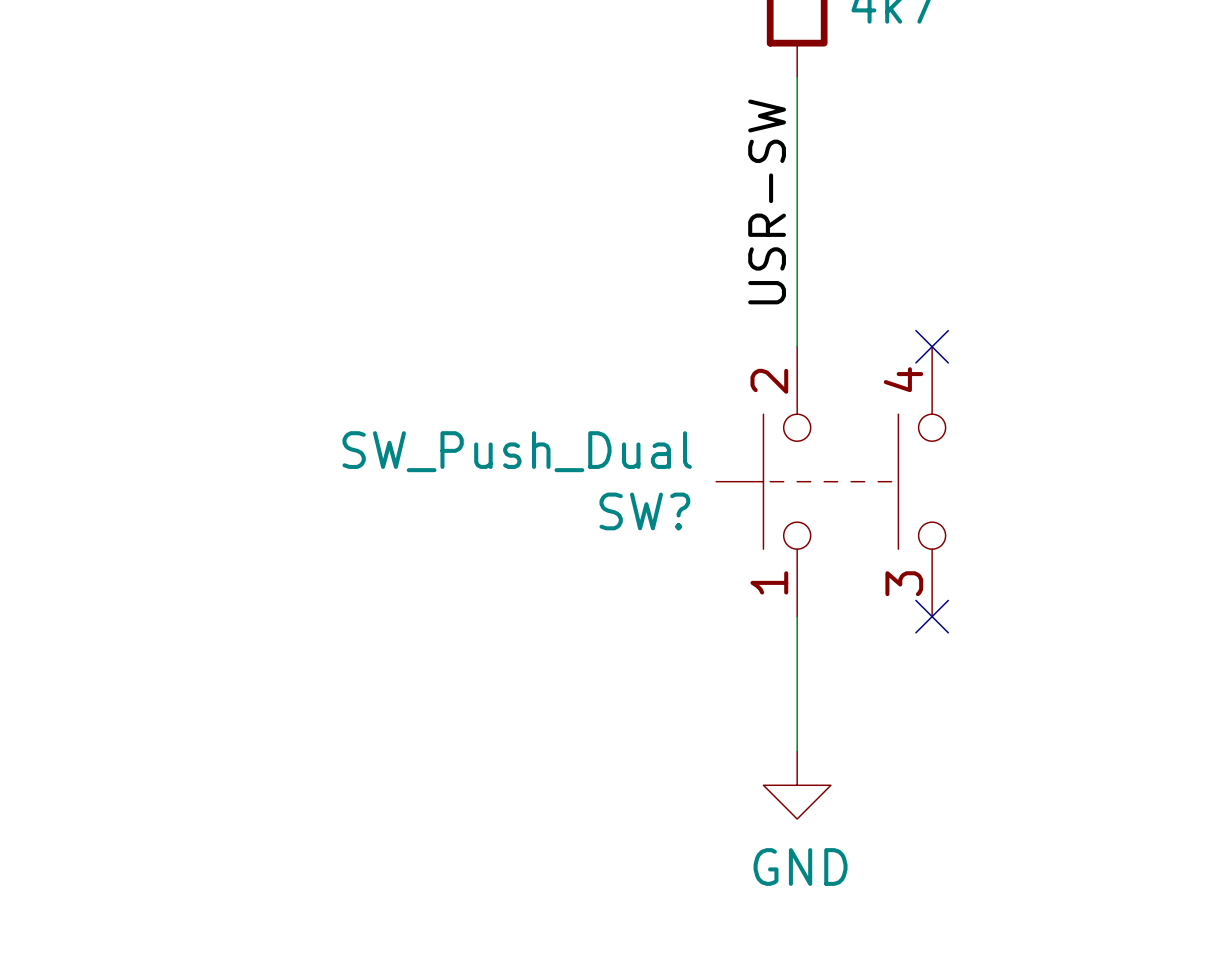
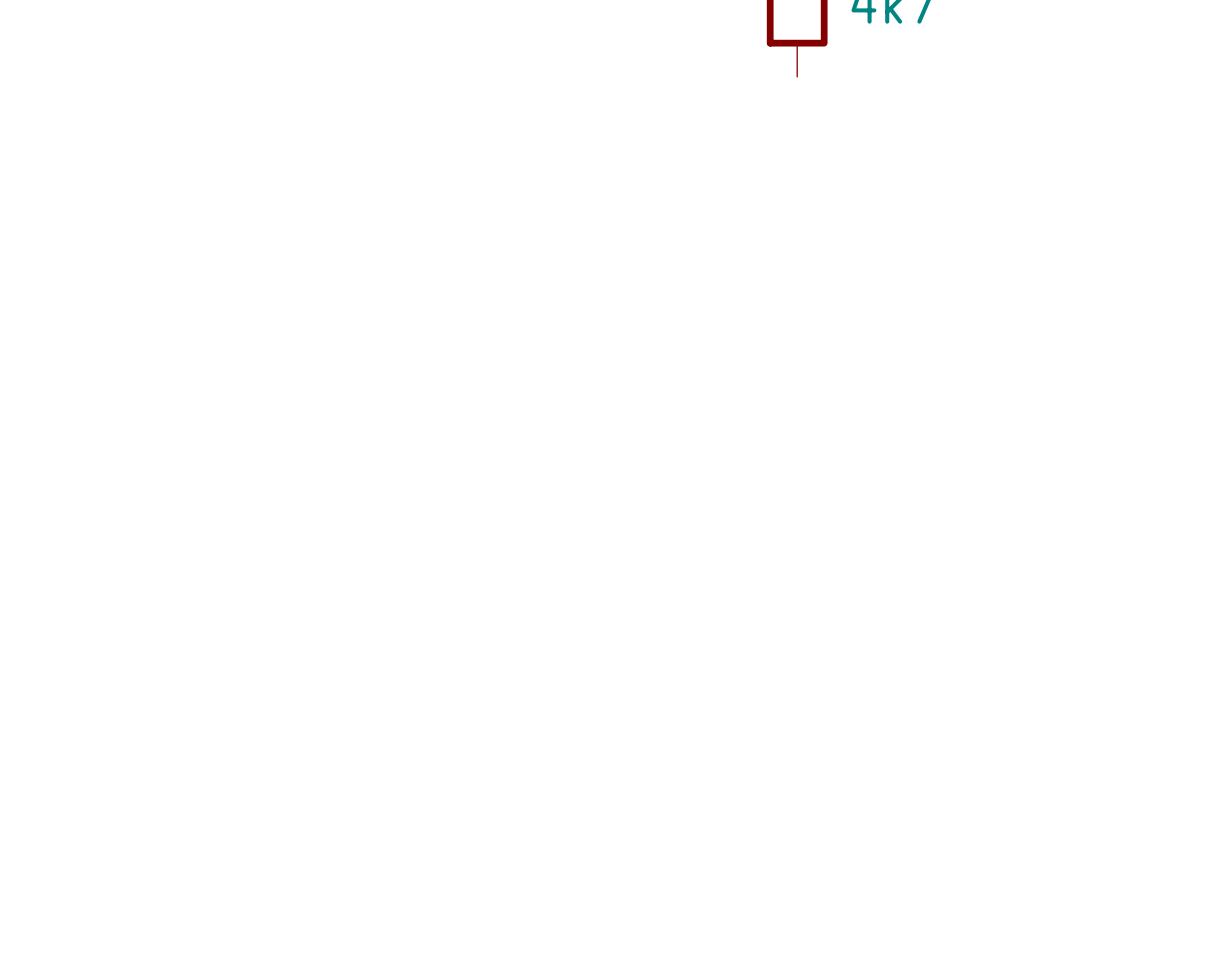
wire: (797, 76) (797, 346) -> none
label: USR-SW (767, 201) -> none
no-connect mark: (932, 346) -> none
SW?: SW_Push_Dual (830, 481) -> none
wire: (797, 616) (797, 751) -> none
no-connect mark: (932, 616) -> none
power symbol: GND (797, 785) -> none

